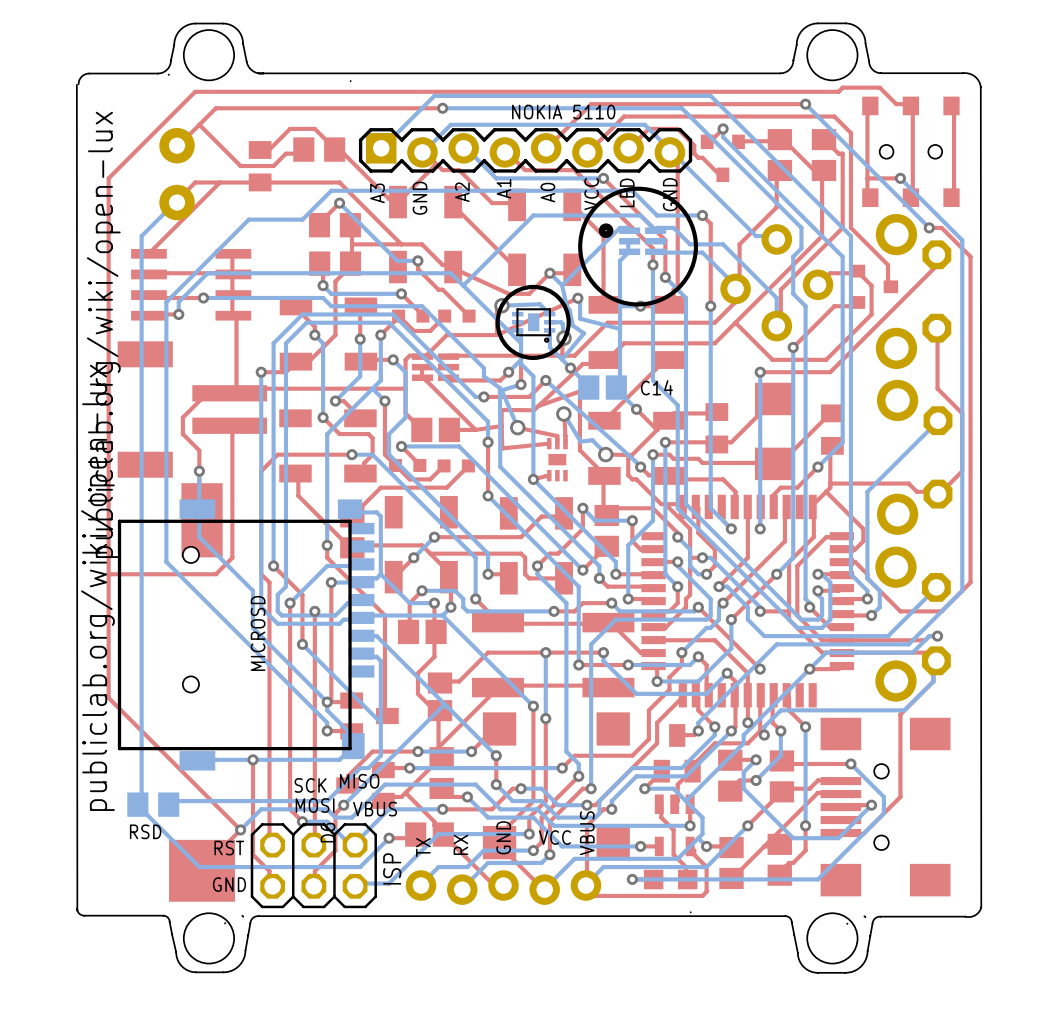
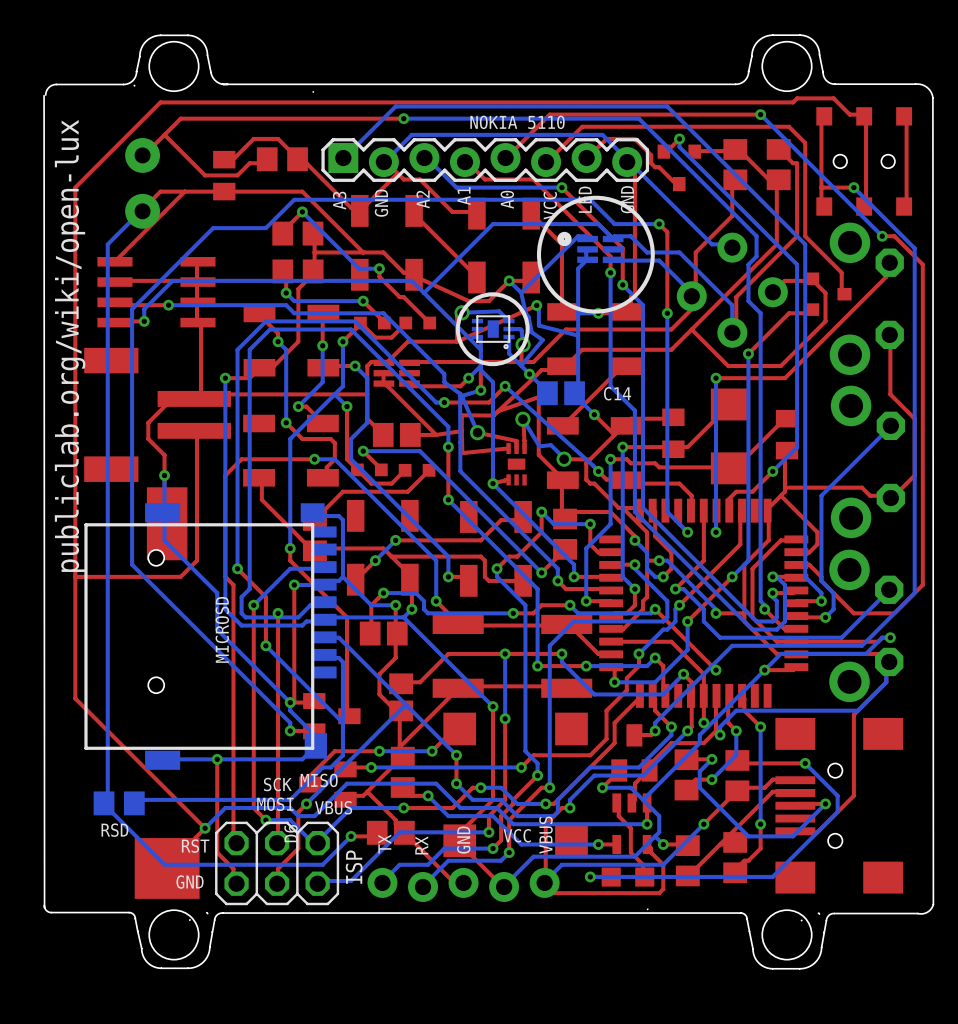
text: publiclab.org/wiki/open-lux (97, 587) -> none

